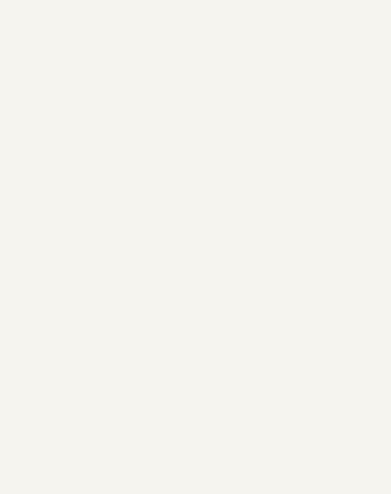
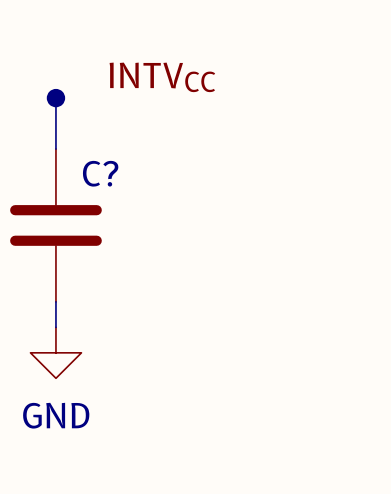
label: none -> INTVCC (162, 77)
wire: none -> (55, 98) (55, 149)
junction: none -> (55, 98)
C?: none -> (55, 225)
wire: none -> (55, 301) (55, 327)
power symbol: none -> GND (55, 352)

